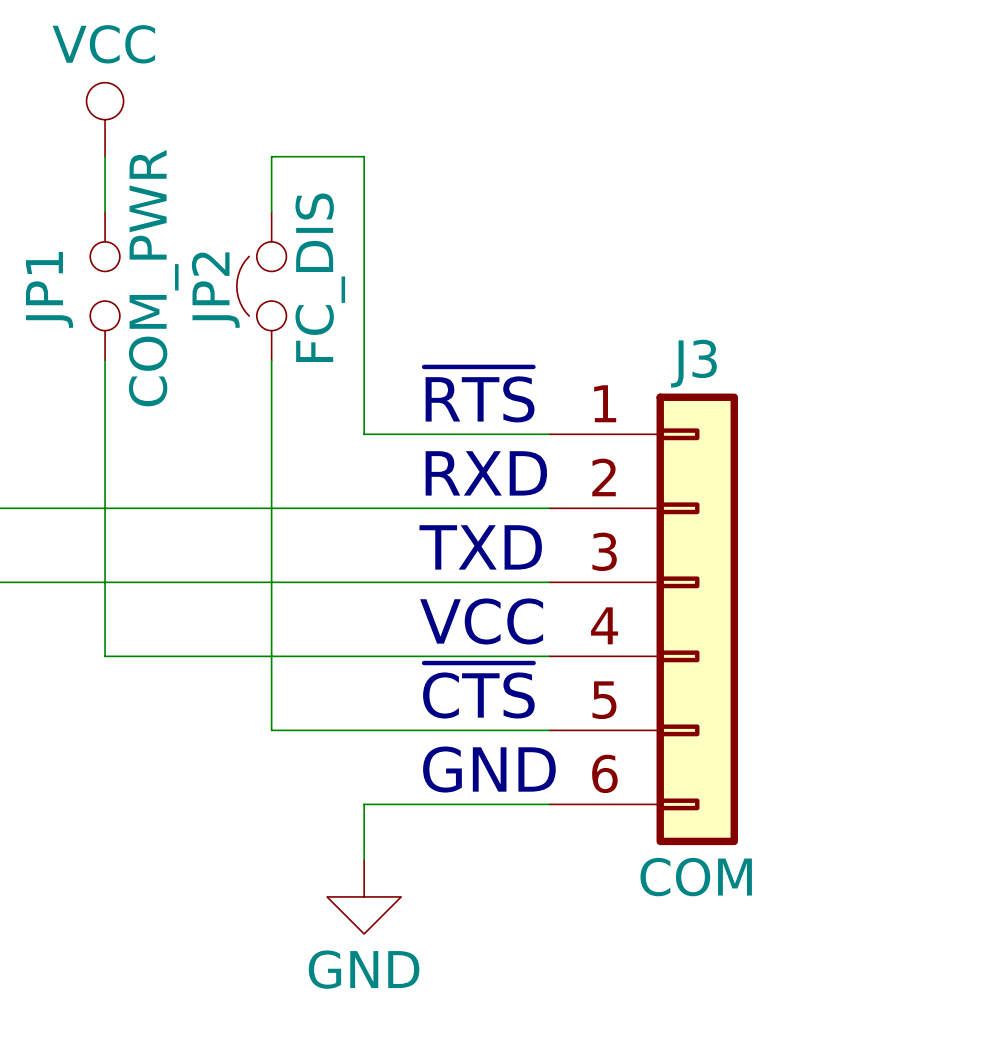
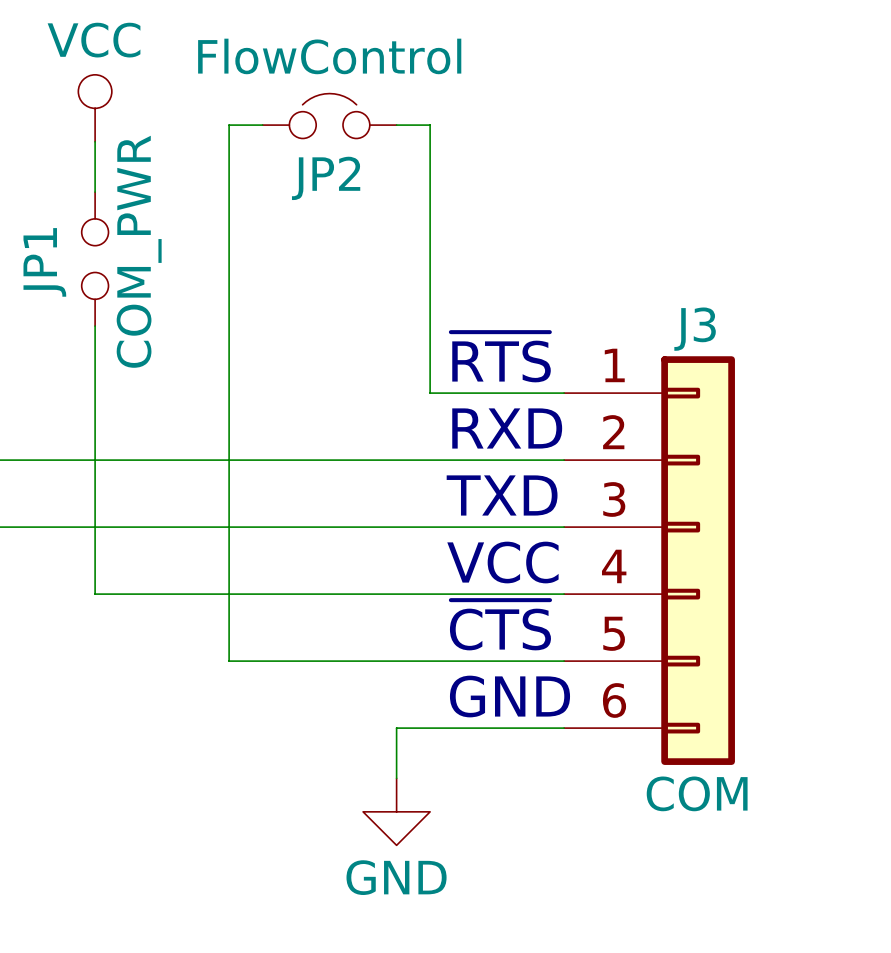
wire: (271, 212) (271, 156) (364, 156) (364, 434) (475, 434) -> (396, 125) (430, 125) (430, 393)
JP2 value: FC_DIS (320, 277) -> FlowControl (329, 56)
JP2 rotation: 0° (261, 286) -> 90° clockwise (329, 116)
JP2 position: (261, 286) -> (329, 116)
JP2 name position: JP2 (215, 290) -> JP2 (326, 178)
wire: (271, 360) (271, 730) -> (262, 125) (229, 125) (229, 661) (245, 661)
text position: ~{RTS} (479, 394) -> ~{RTS} (500, 357)
text position: RXD (486, 473) -> RXD (507, 428)
text position: TXD (480, 547) -> TXD (502, 495)
J3 position: (643, 619) -> (649, 560)
text position: VCC (481, 621) -> VCC (502, 562)
text position: ~{CTS} (478, 690) -> ~{CTS} (500, 625)
text position: GND (489, 769) -> GND (509, 696)
wire: (438, 804) (364, 804) (364, 859) -> (396, 728) (396, 778)
power symbol position: GND (364, 896) -> GND (396, 811)

